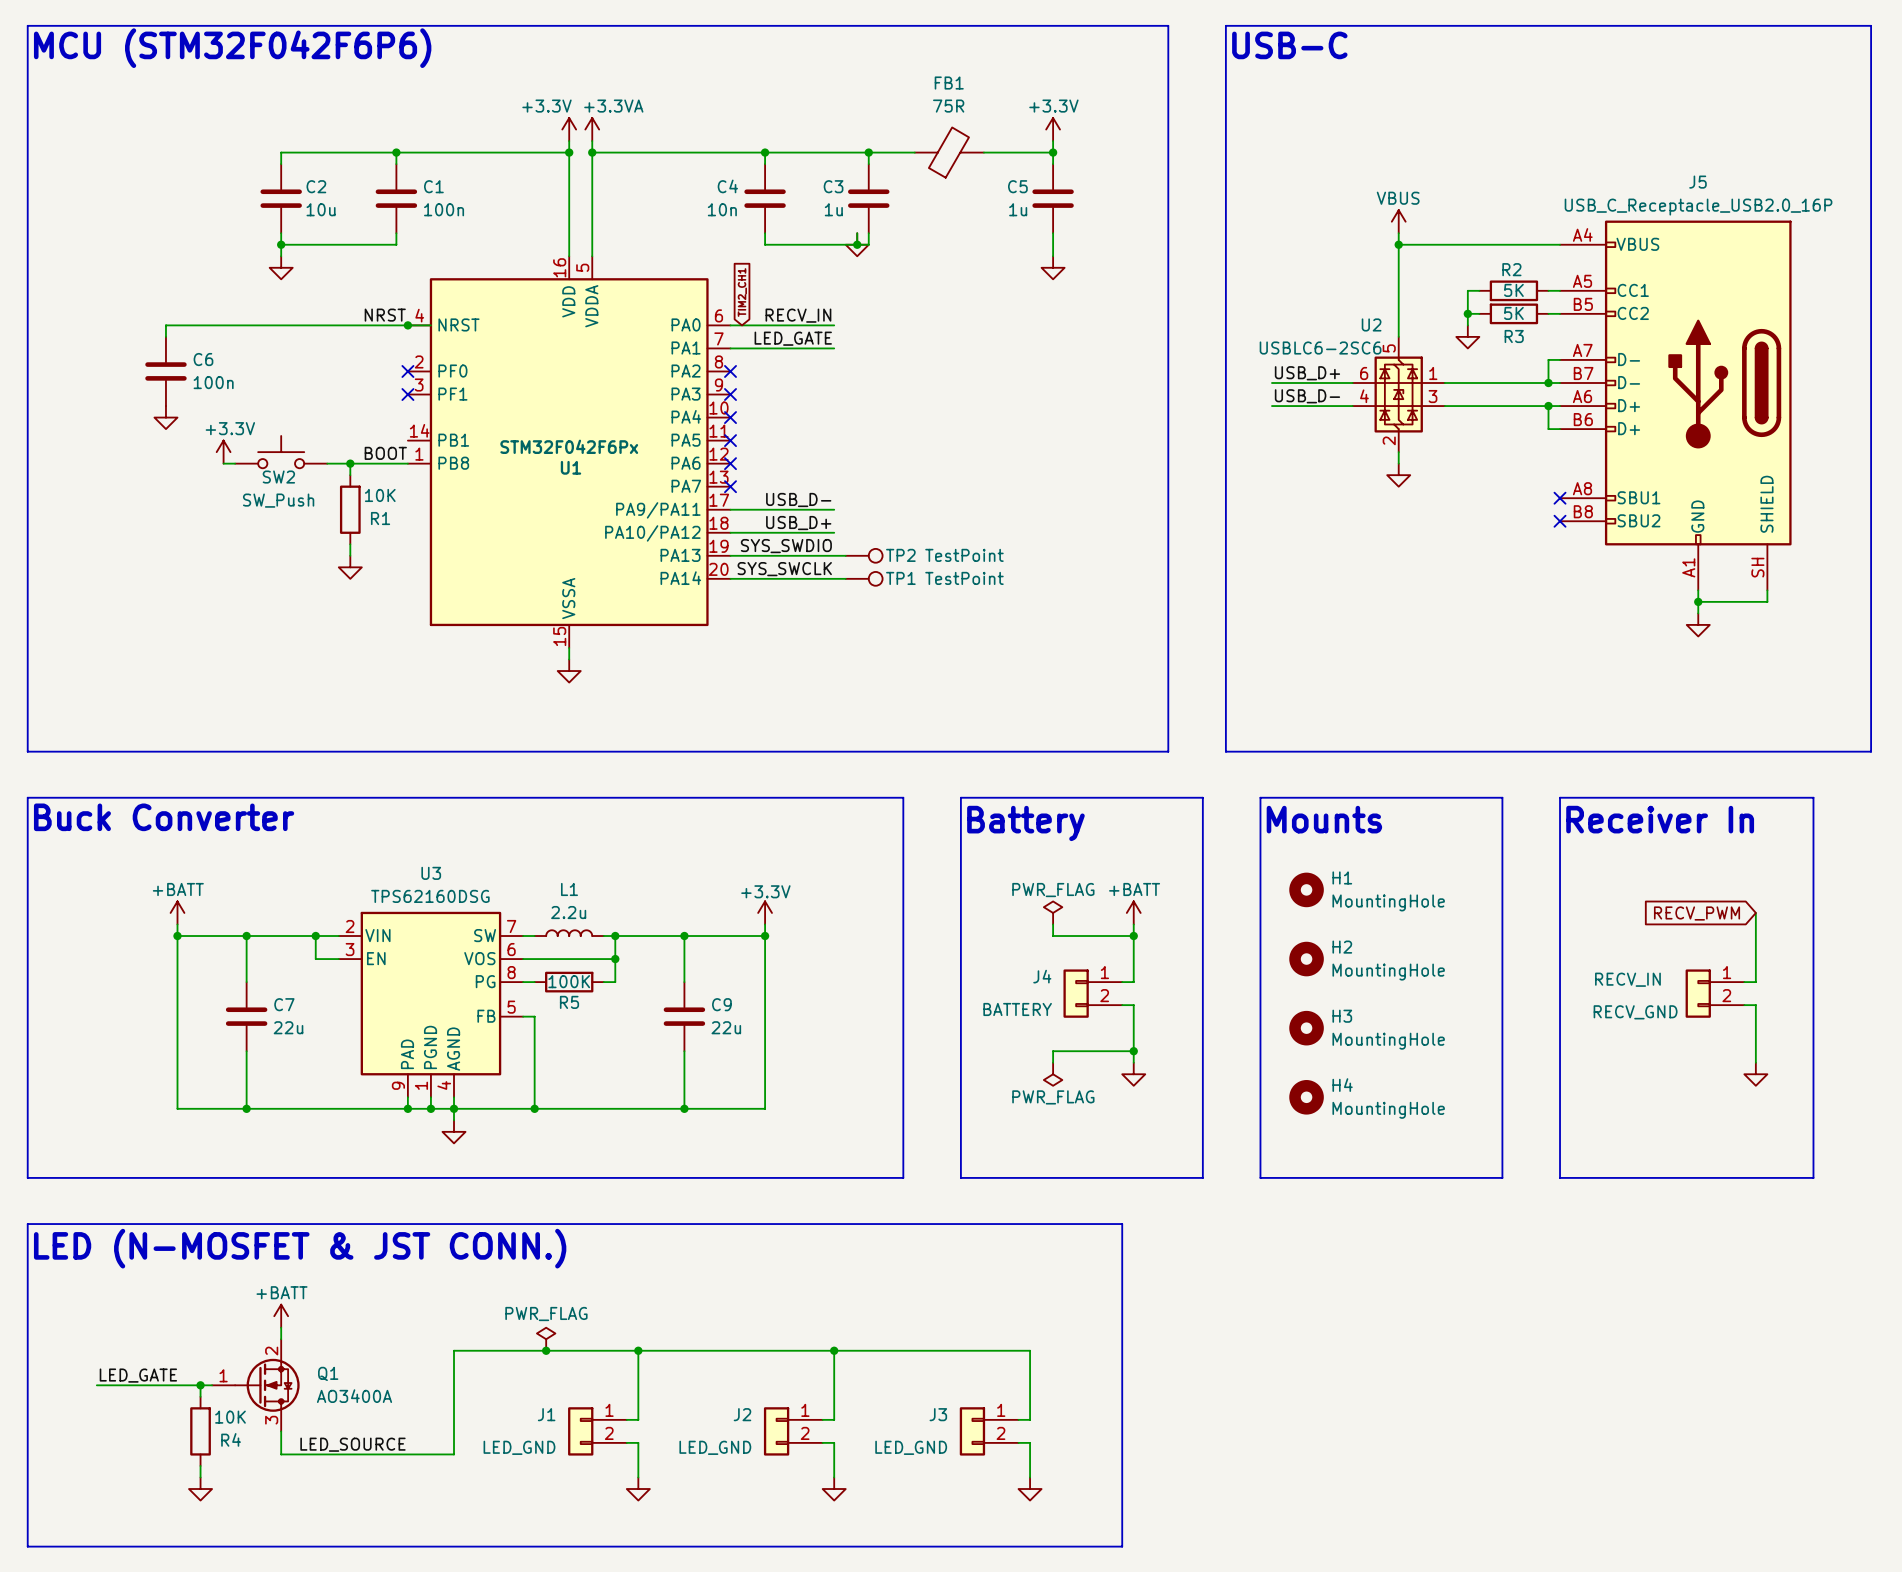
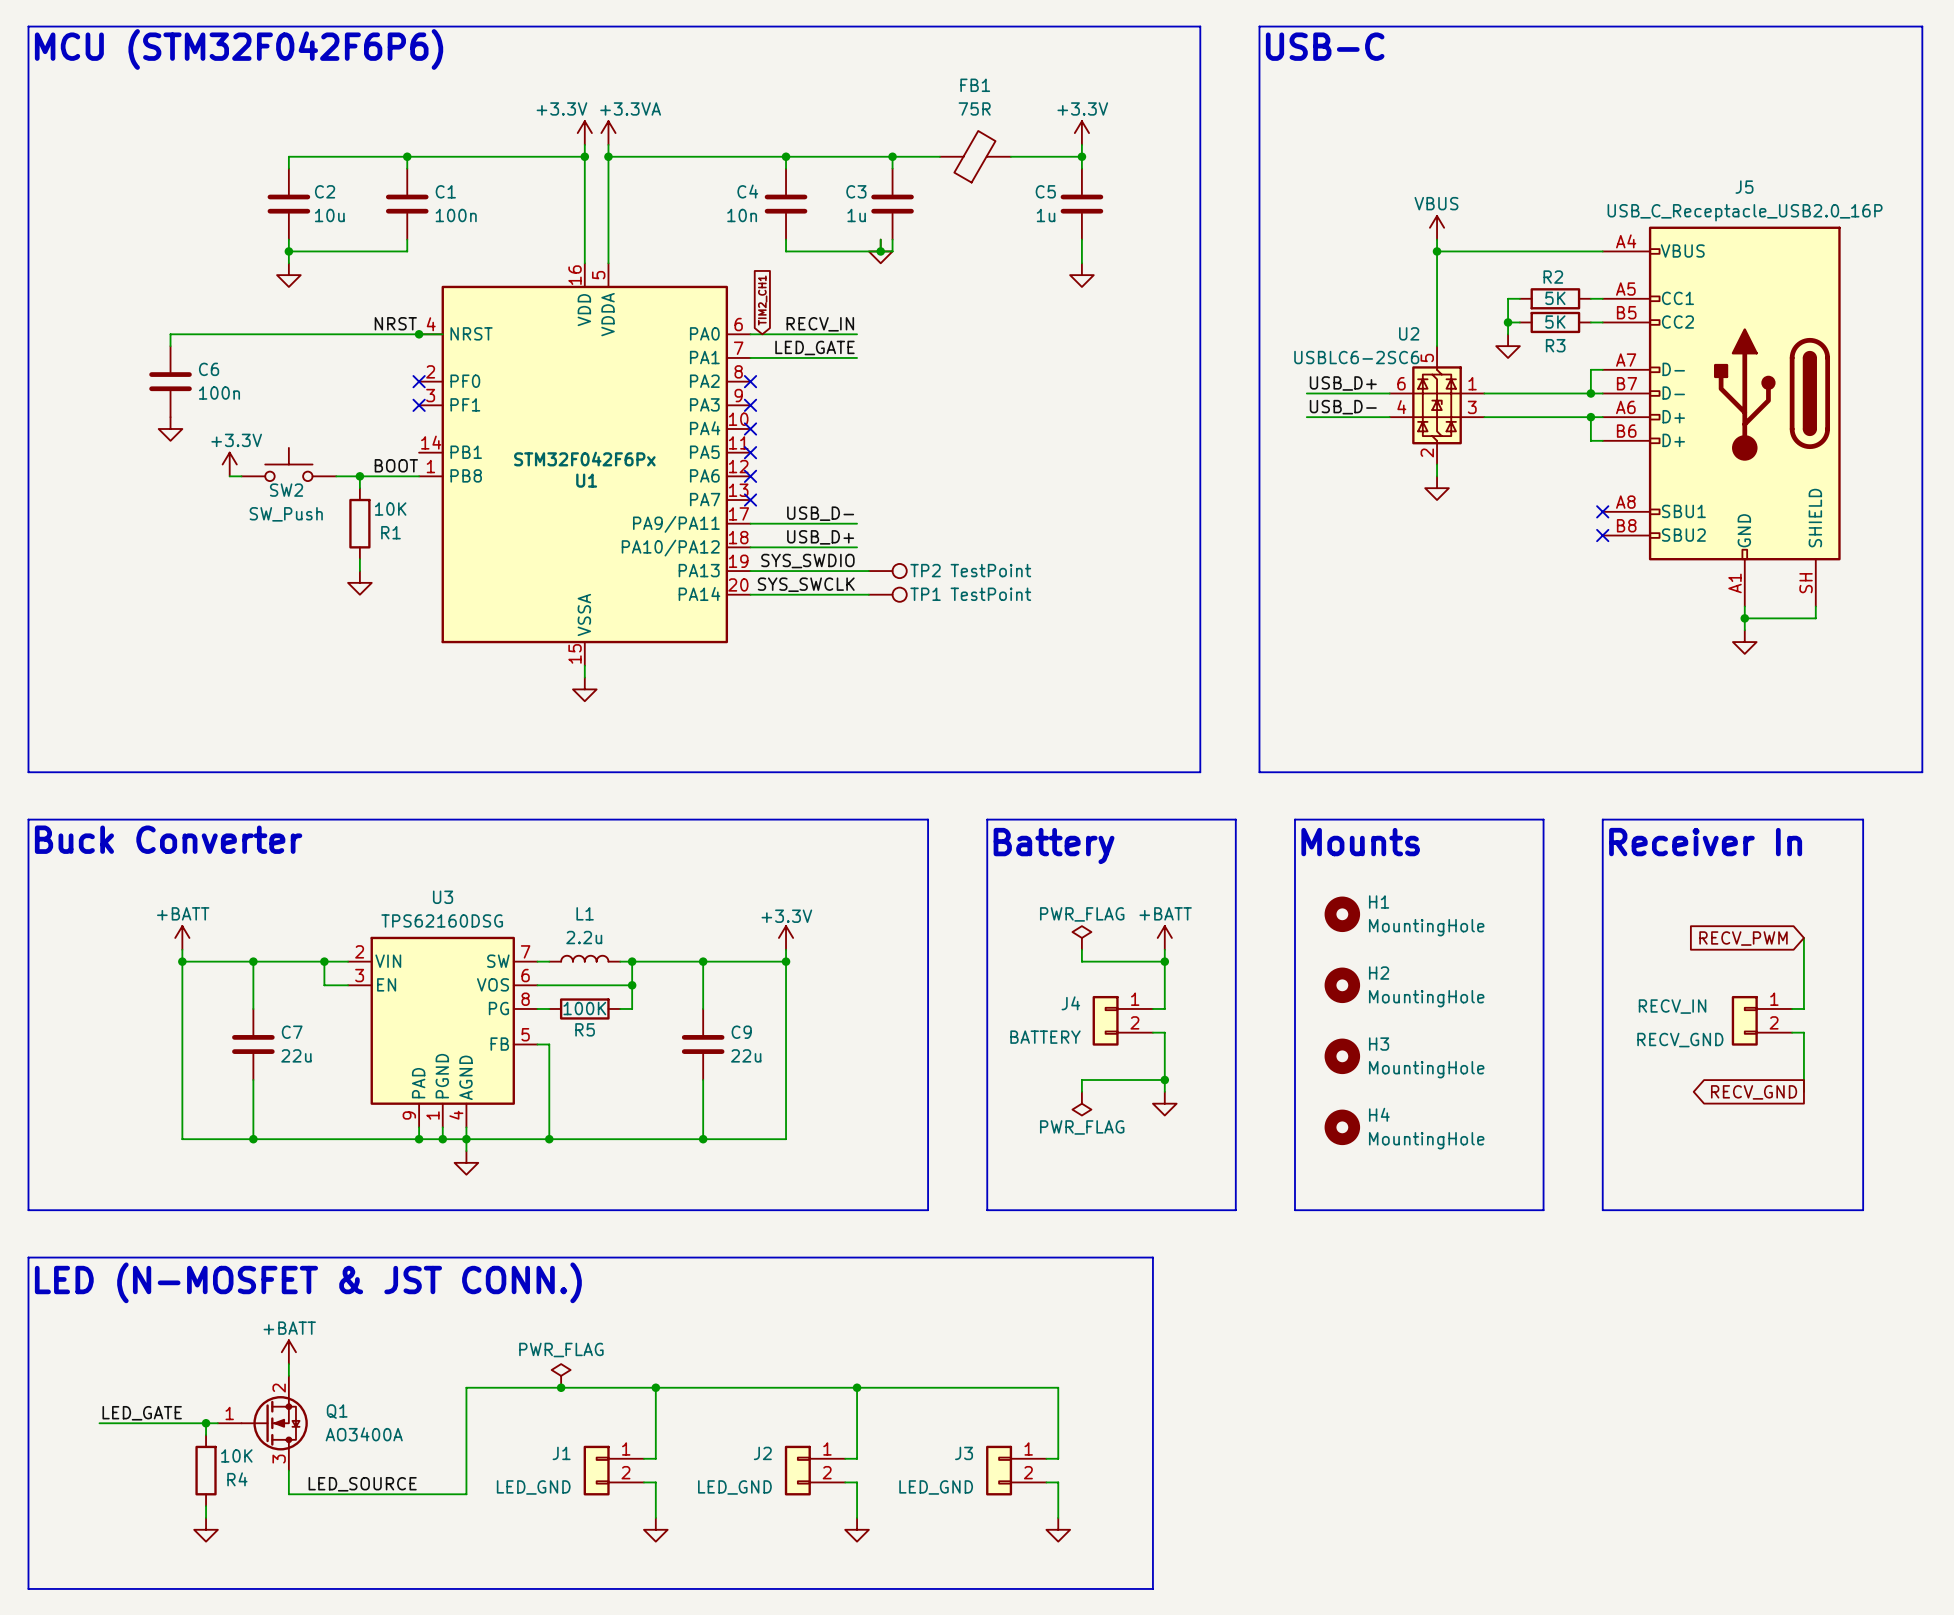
global label: none -> RECV_GND (1754, 1092)
power symbol: (1755, 1074) -> none

